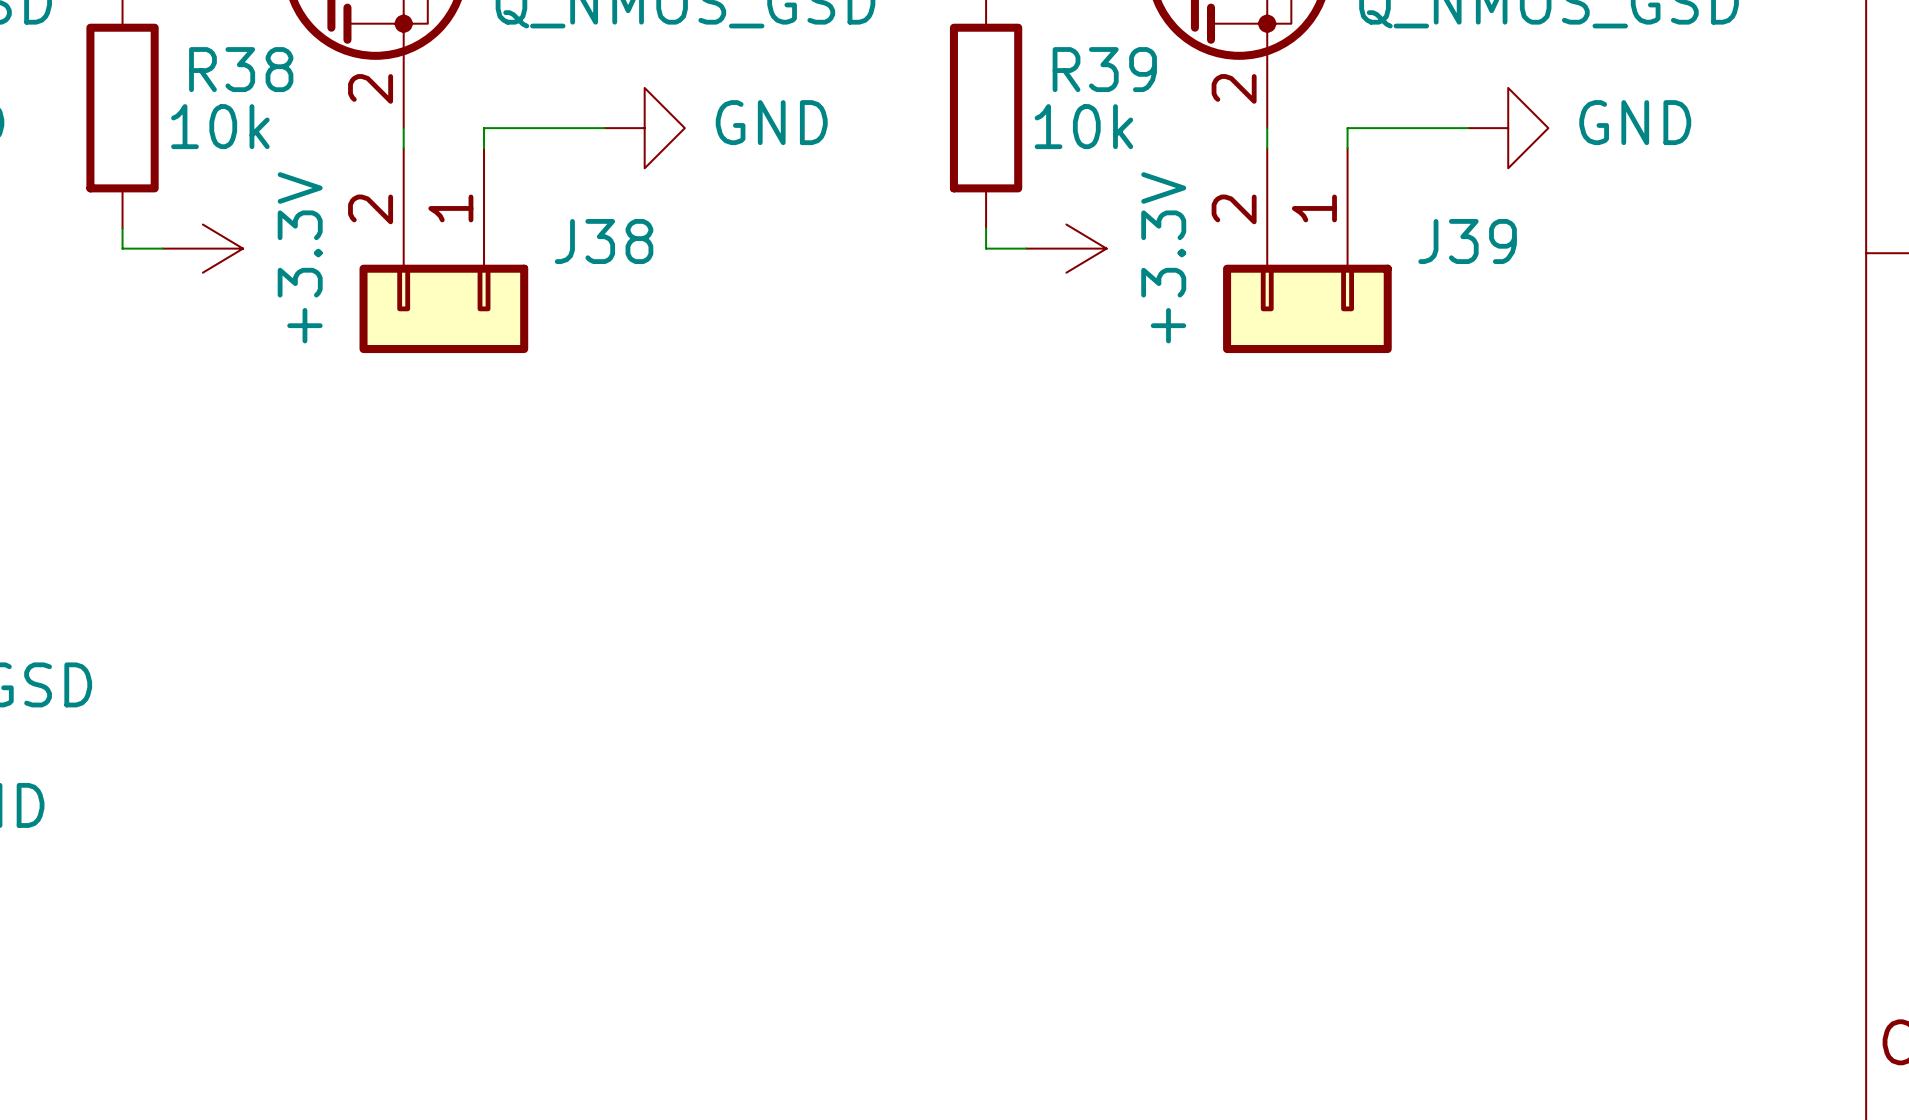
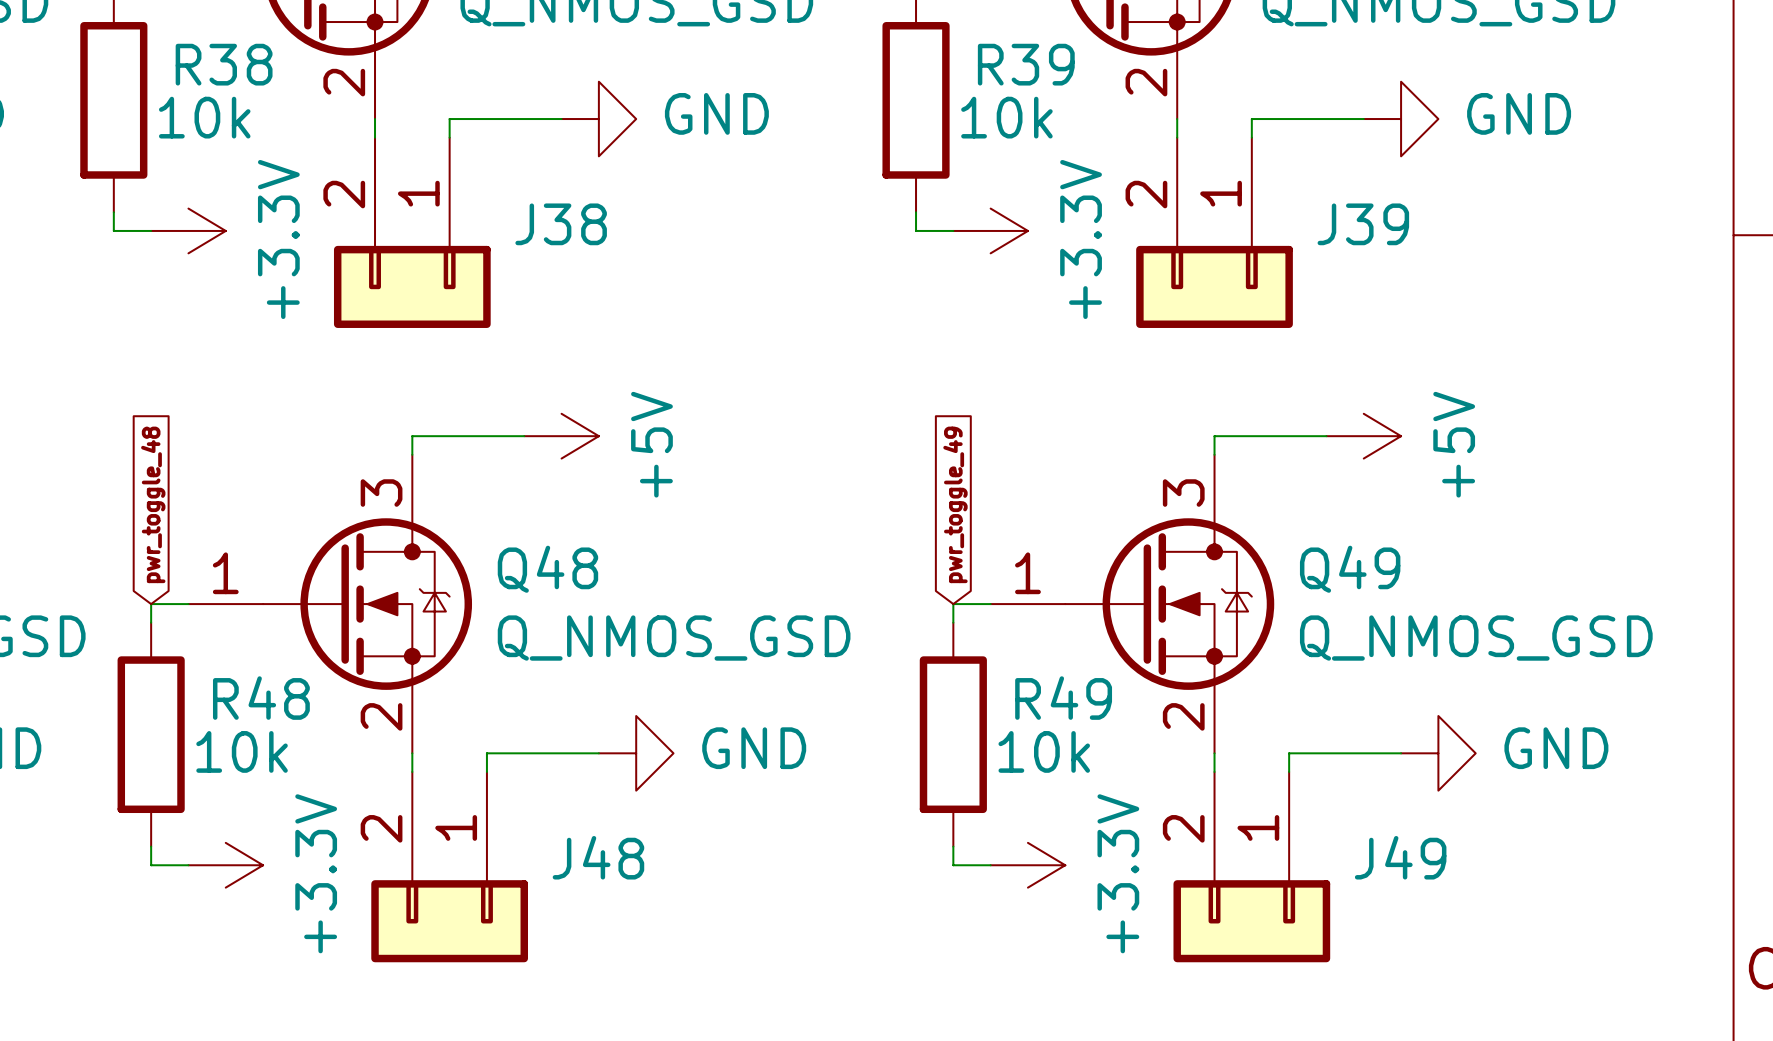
wire: none -> (524, 436) (412, 436) (412, 454)
power symbol: none -> +5V (561, 436)
wire: none -> (1326, 436) (1214, 436) (1214, 454)
power symbol: none -> +5V (1363, 436)
global label: none -> pwr_toggle_48 (153, 504)
global label: none -> pwr_toggle_49 (955, 504)
wire: none -> (188, 604) (151, 604) (151, 622)
Q48: none -> Q_NMOS_GSD (330, 604)
wire: none -> (990, 604) (953, 604) (953, 622)
Q49: none -> Q_NMOS_GSD (1132, 604)
R48: none -> 10k (151, 734)
R49: none -> 10k (953, 734)
wire: none -> (412, 753) (412, 771)
wire: none -> (598, 753) (486, 753) (486, 771)
power symbol: none -> GND (636, 753)
wire: none -> (1214, 753) (1214, 771)
wire: none -> (1401, 753) (1289, 753) (1289, 771)
power symbol: none -> GND (1438, 753)
wire: none -> (151, 846) (151, 865) (188, 865)
wire: none -> (953, 846) (953, 865) (990, 865)
power symbol: none -> +3.3V (225, 865)
power symbol: none -> +3.3V (1027, 865)
J48: none -> (449, 867)
J49: none -> (1251, 867)

